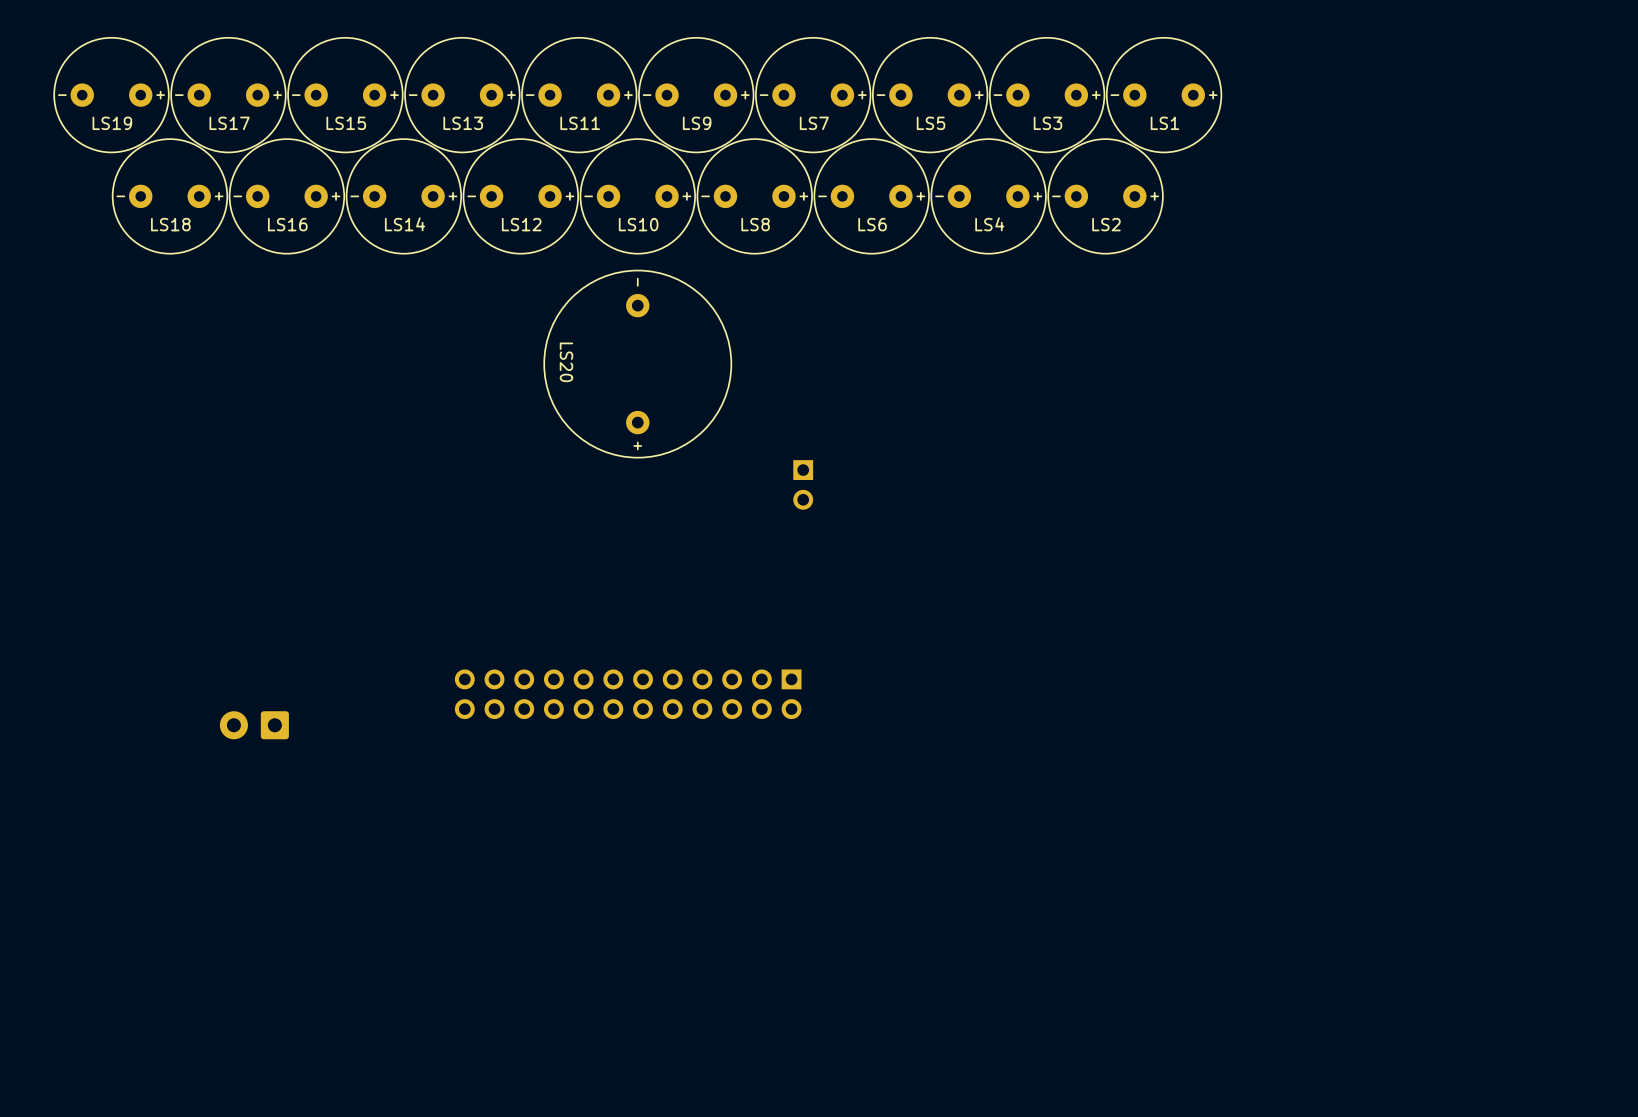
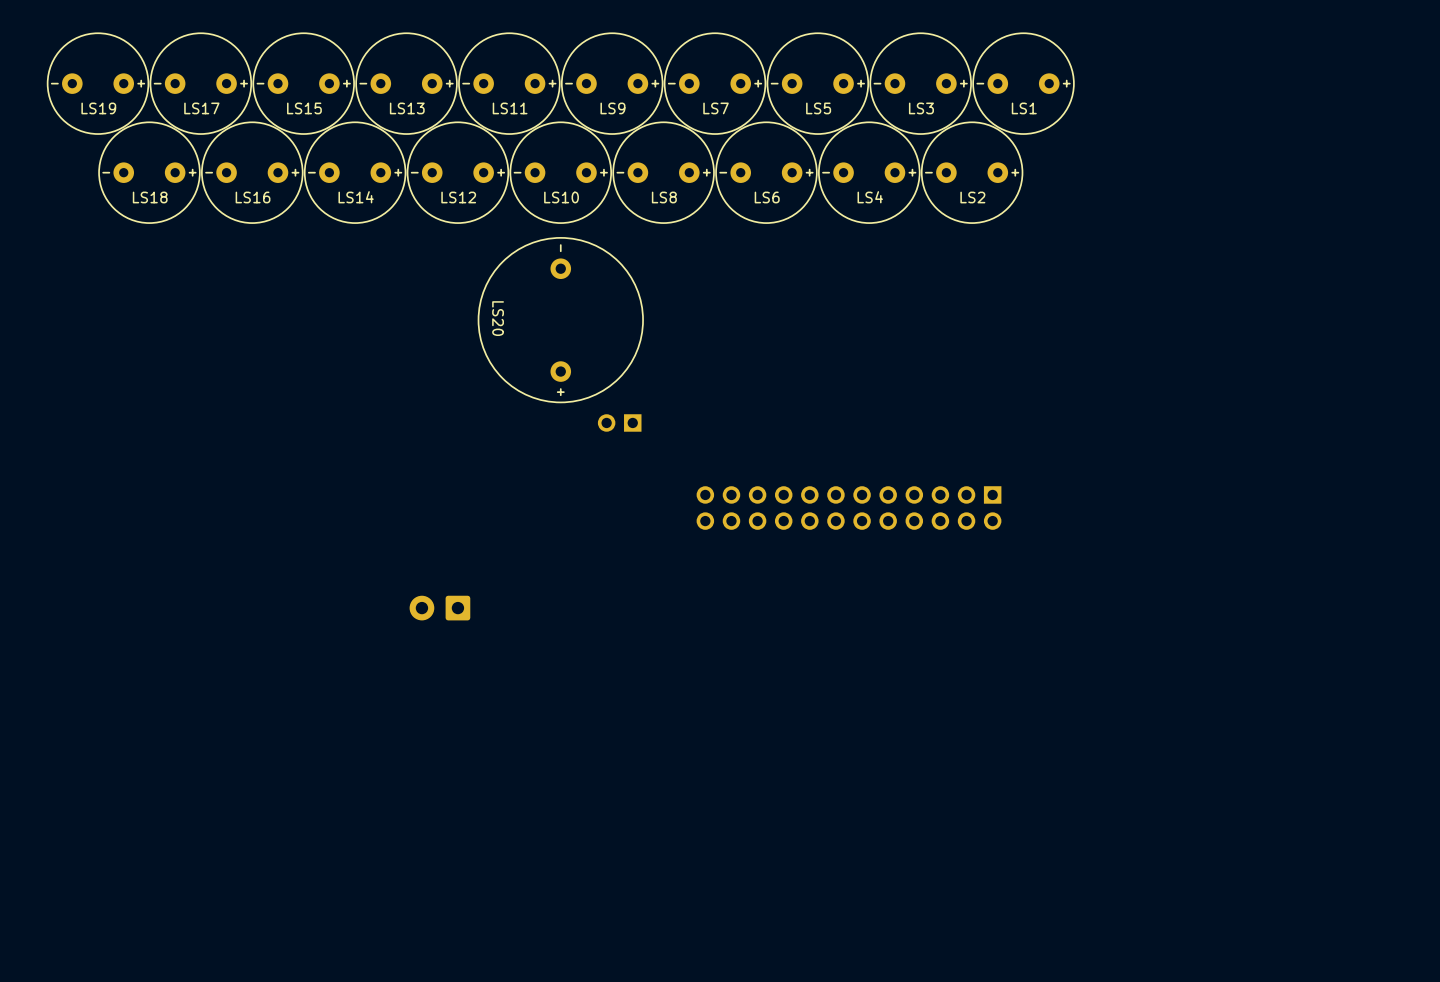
part rotation: 0° (803, 484) -> 90° clockwise (619, 422)
part position: (803, 484) -> (619, 422)
part: none -> (849, 508)
part: (628, 694) -> none
part position: (254, 725) -> (439, 608)

